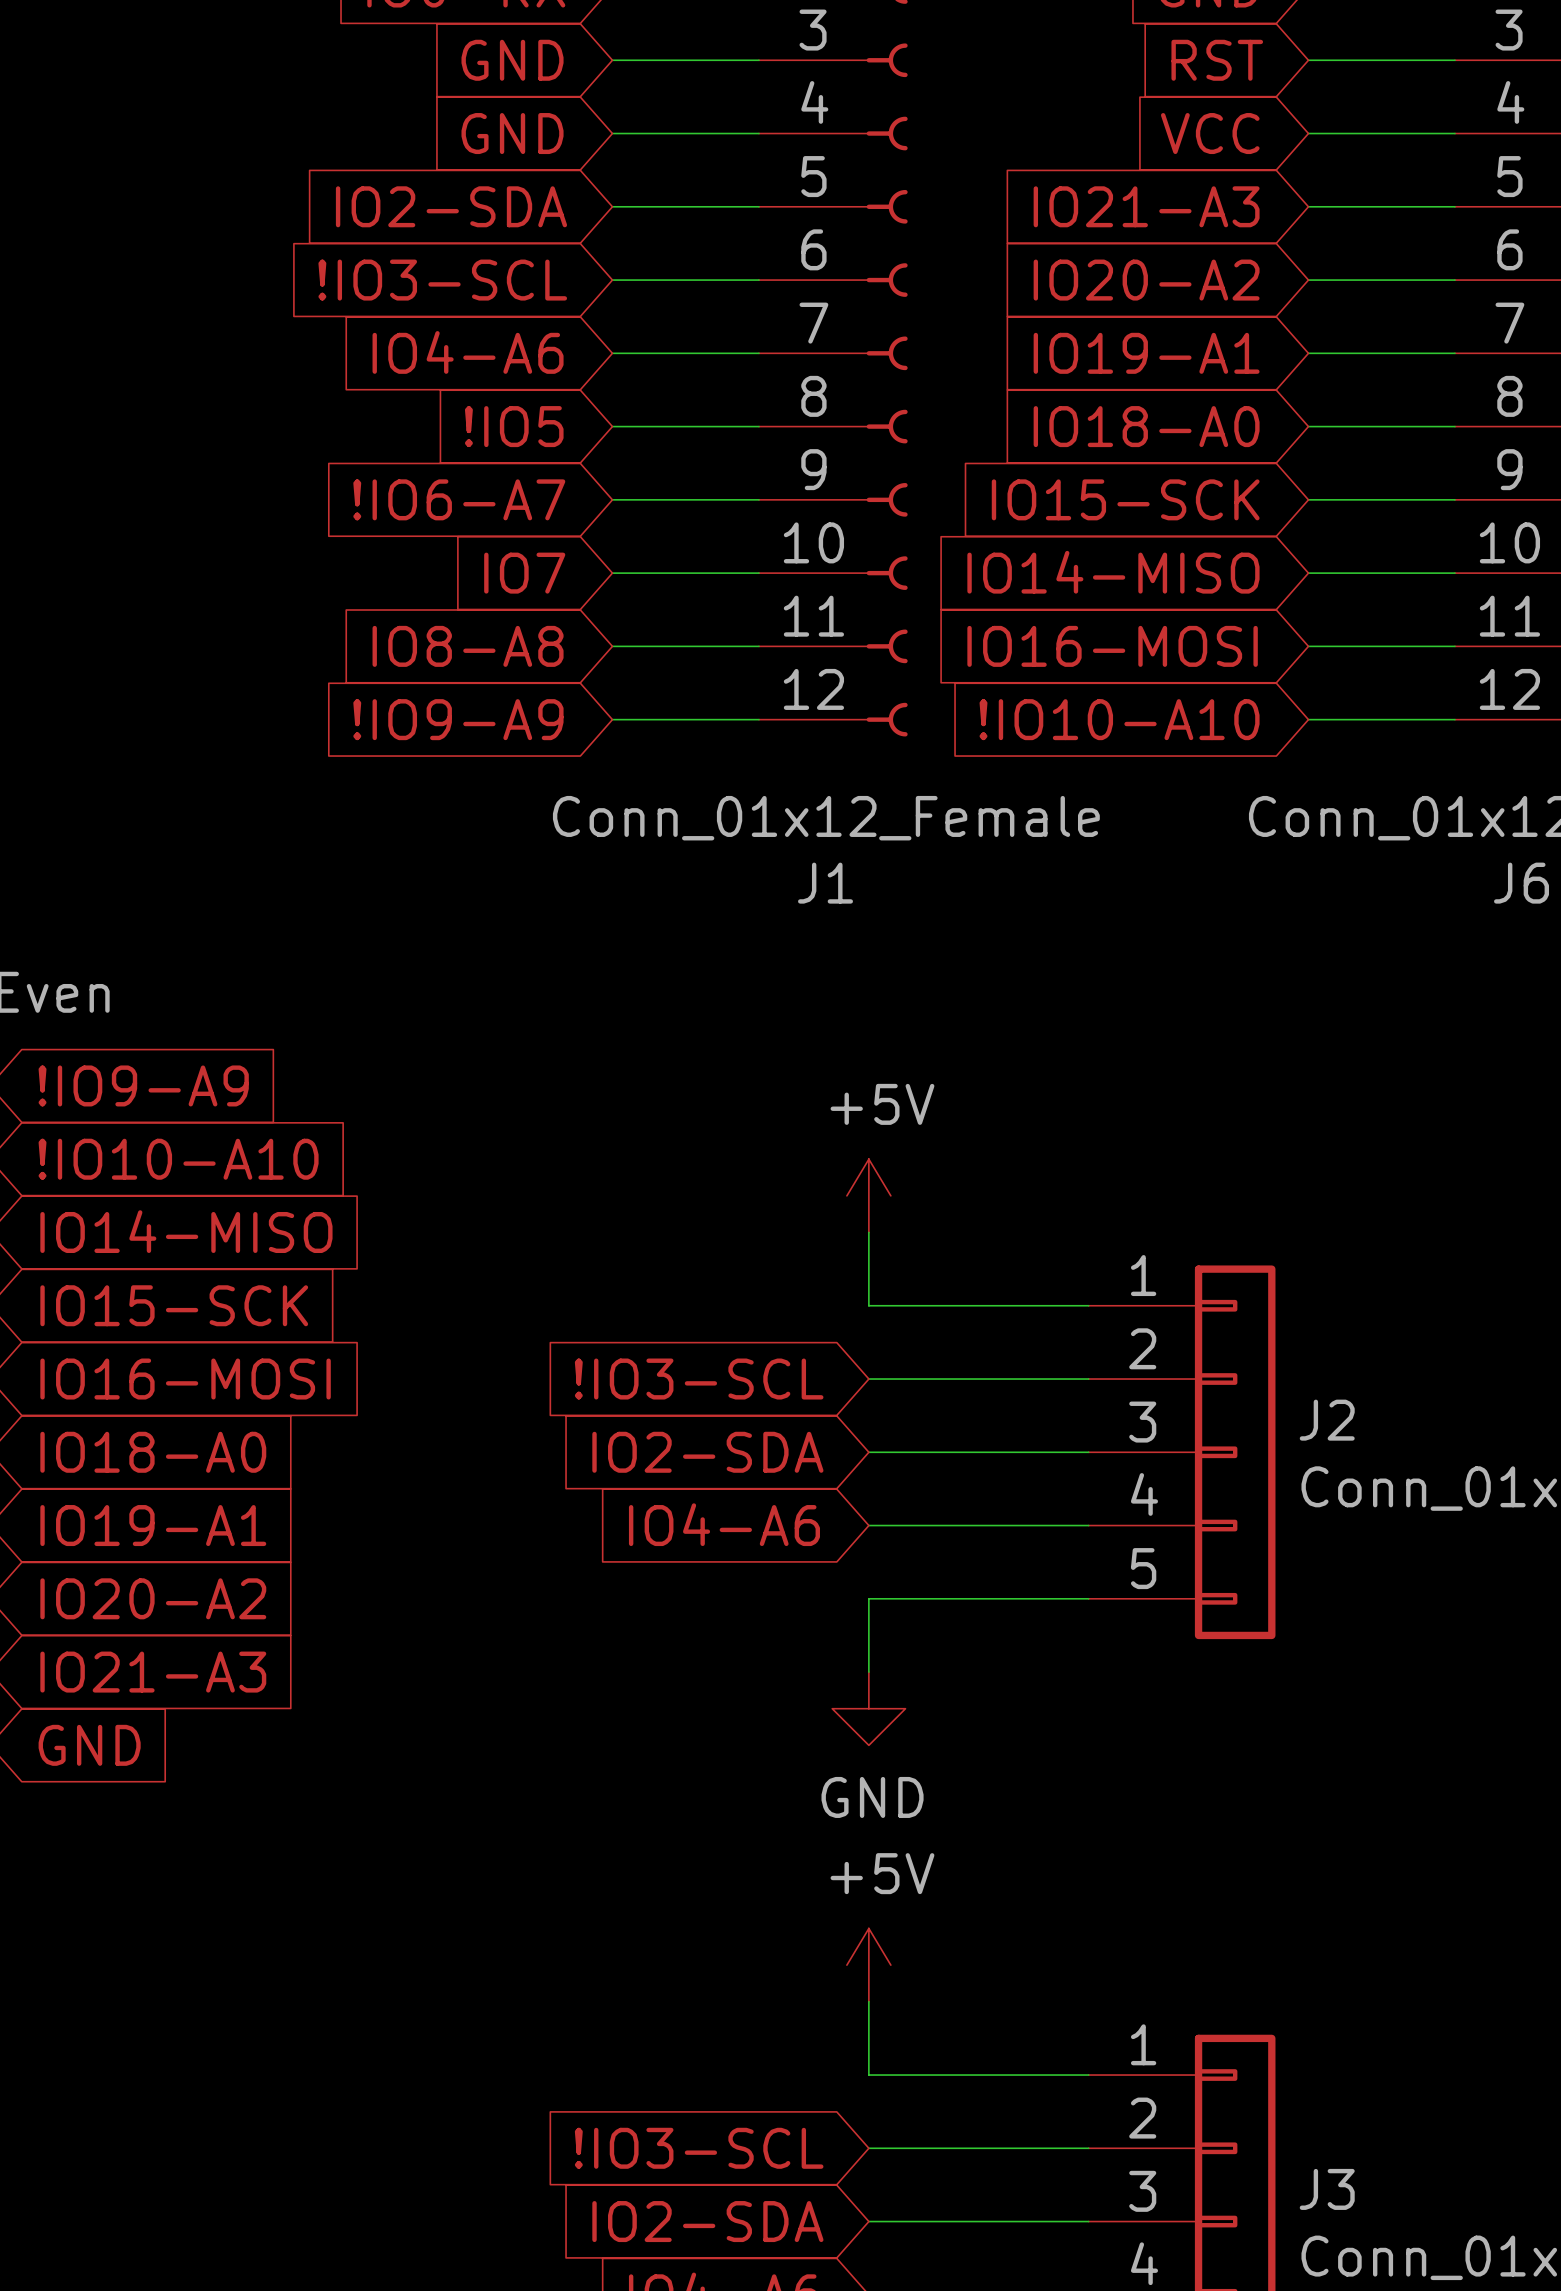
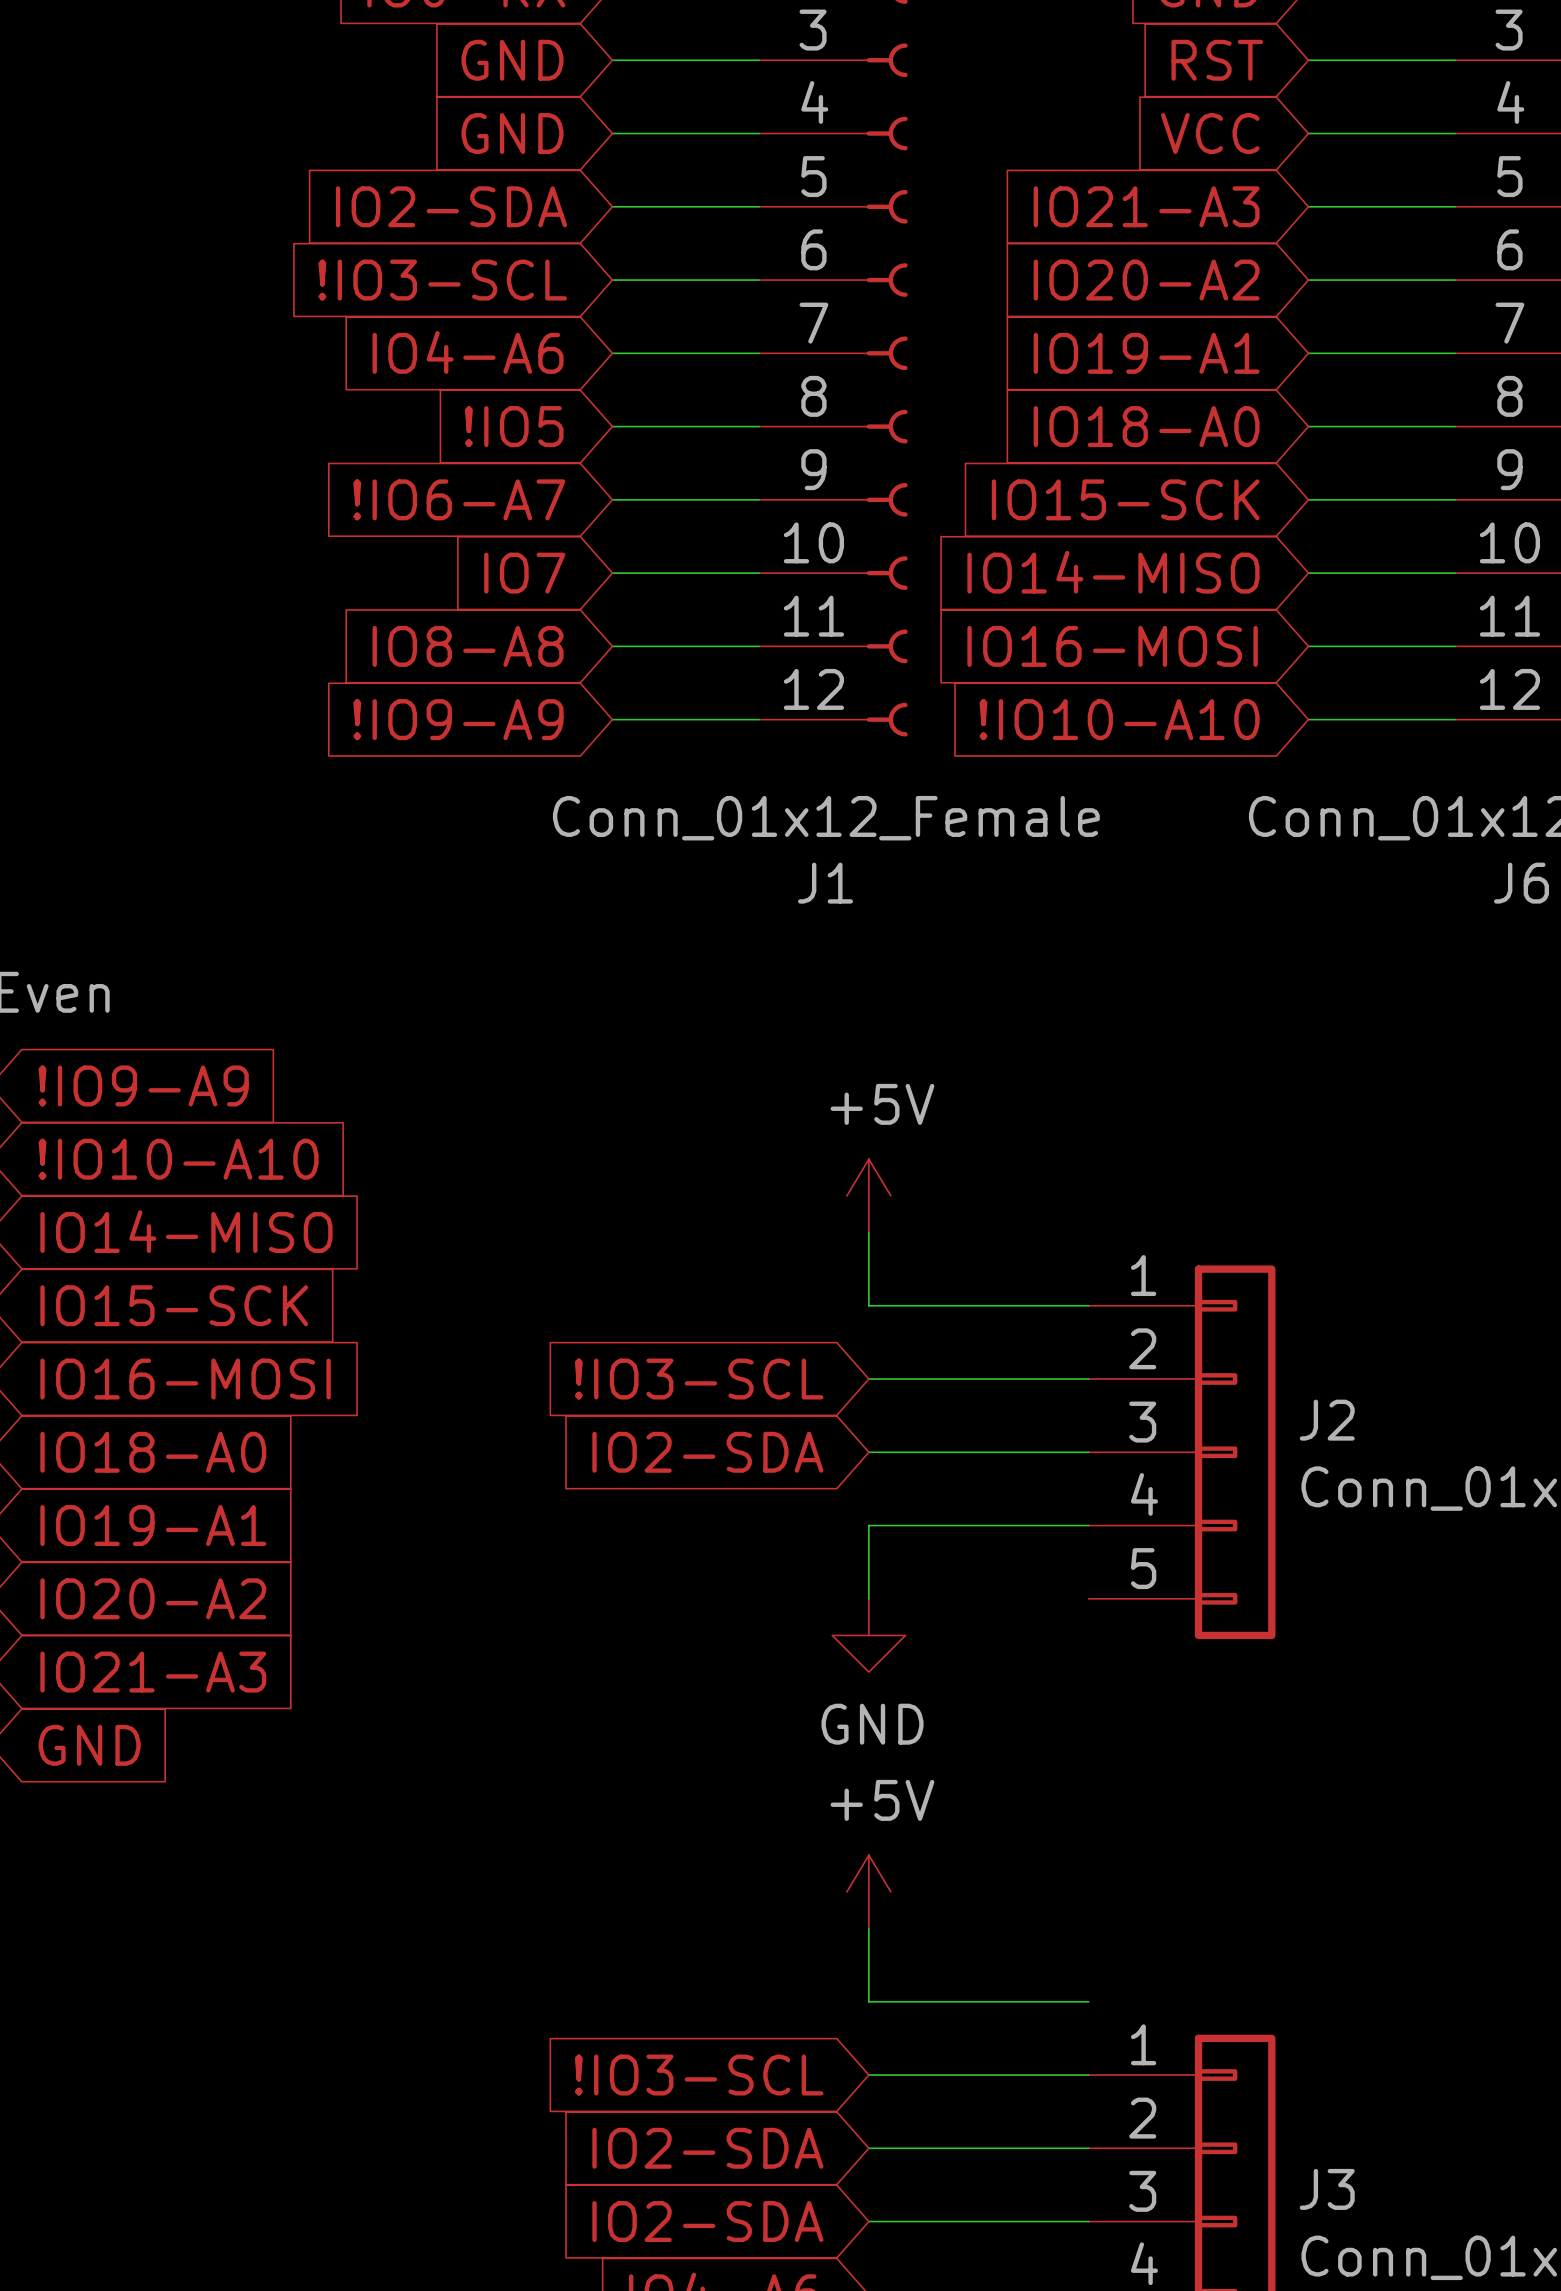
global label: IO4-A6 (724, 1524) -> none
wire: (1088, 1598) (868, 1598) (868, 1672) -> none
power symbol position: GND (868, 1708) -> GND (868, 1635)
wire: none -> (868, 1928) (868, 2001) (1088, 2001)
power symbol position: +5V (868, 1965) -> +5V (868, 1891)
wire: (868, 2001) (868, 2075) -> (868, 1525) (868, 1598)
global label: none -> !IO3-SCL (699, 2075)
global label: !IO3-SCL (699, 2148) -> IO2-SDA (707, 2148)

